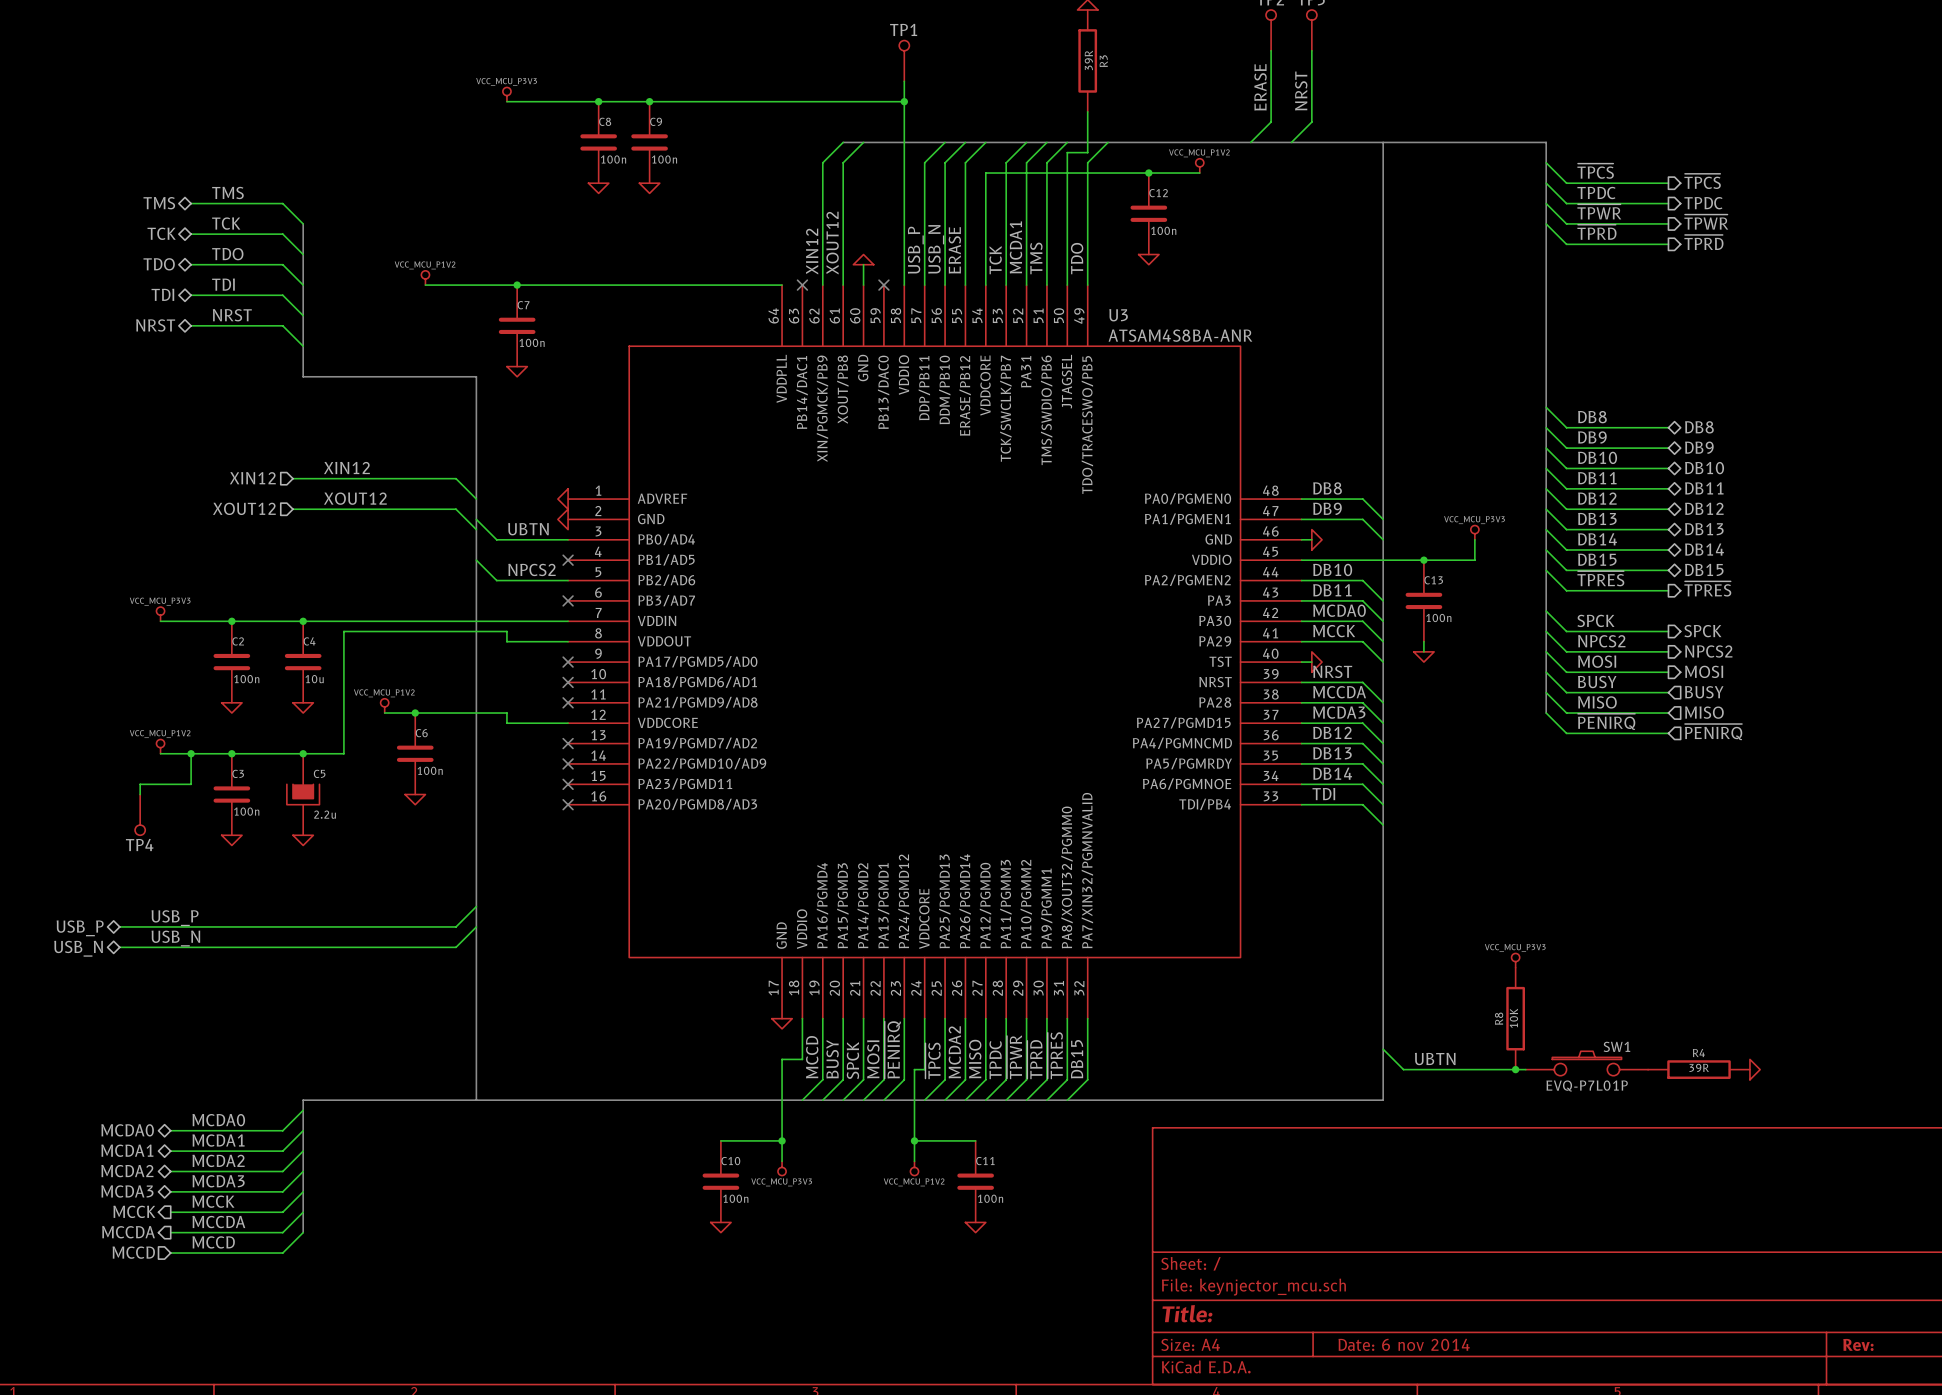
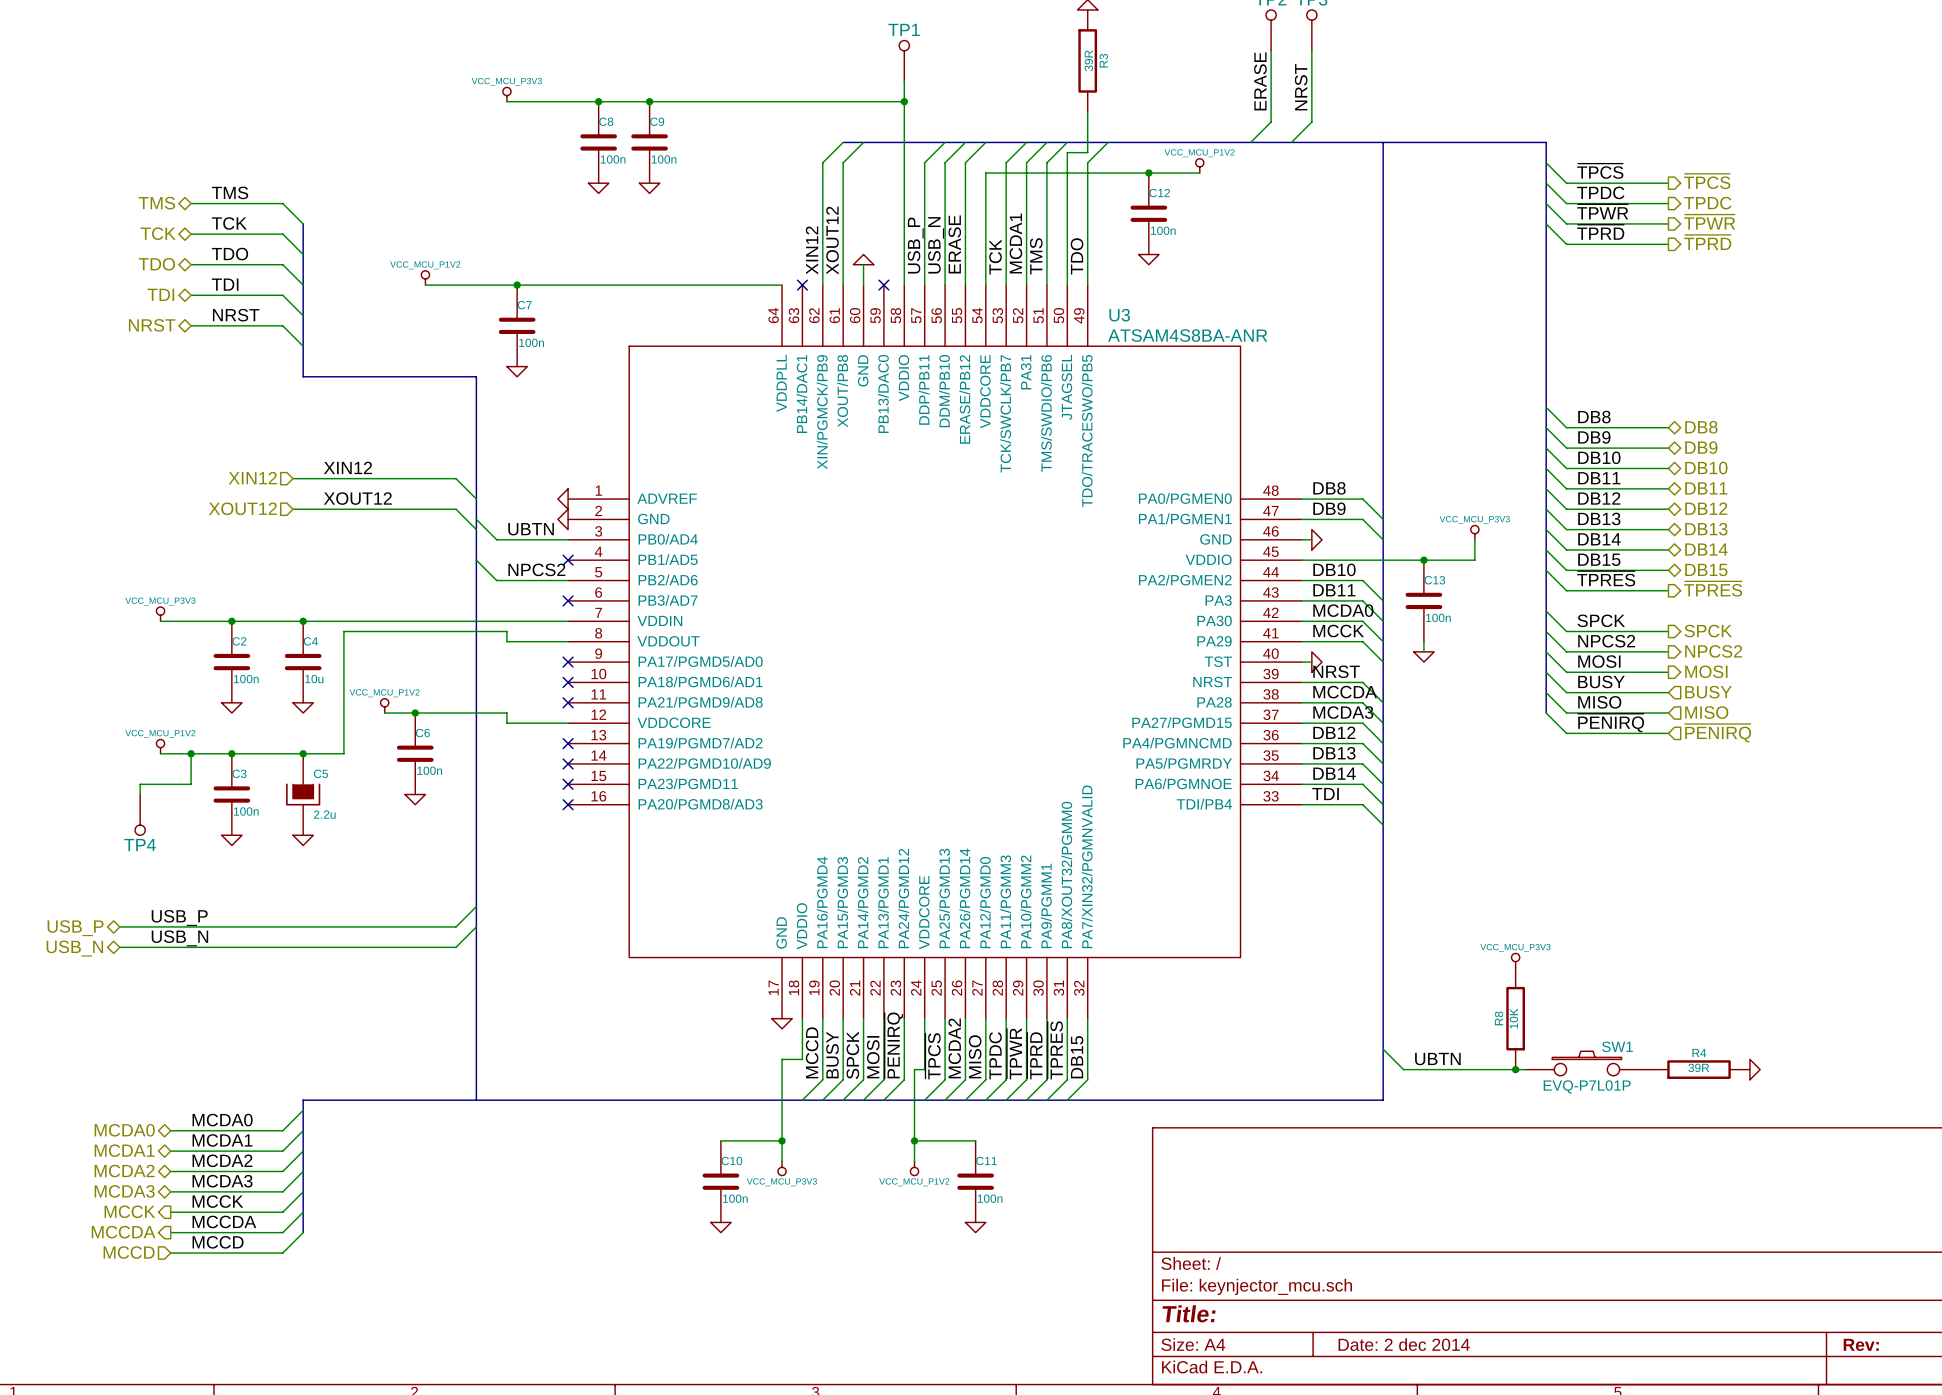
title block: Date: 6 nov 2014 (1404, 1344) -> Date: 2 dec 2014 (1404, 1344)

